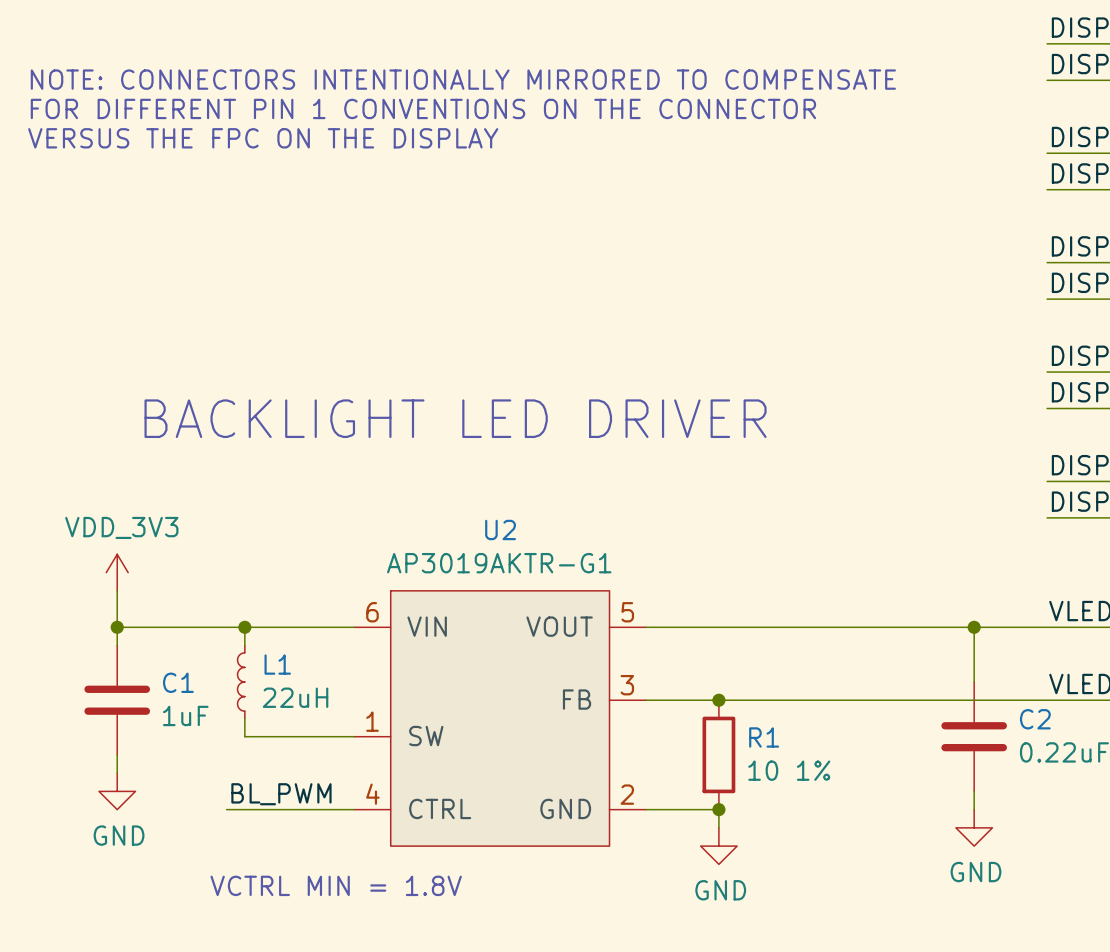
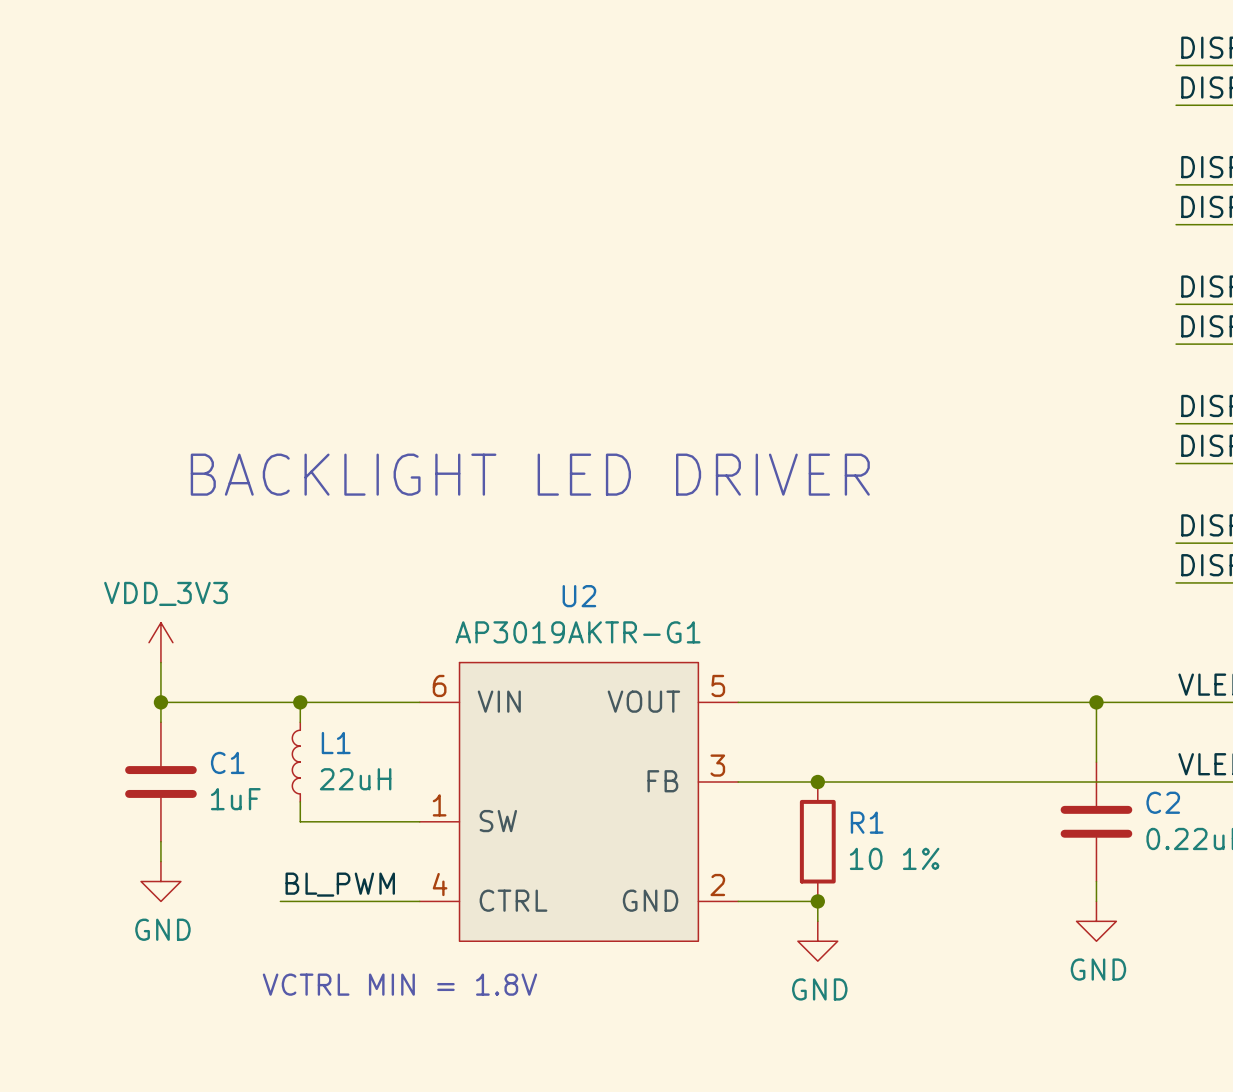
text: NOTE: CONNECTORS INTENTIONALLY MIRRORED TO COMPENSATE (463, 79) -> none
text: FOR DIFFERENT PIN 1 CONVENTIONS ON THE CONNECTOR (423, 108) -> none
text: VERSUS THE FPC ON THE DISPLAY (263, 138) -> none

